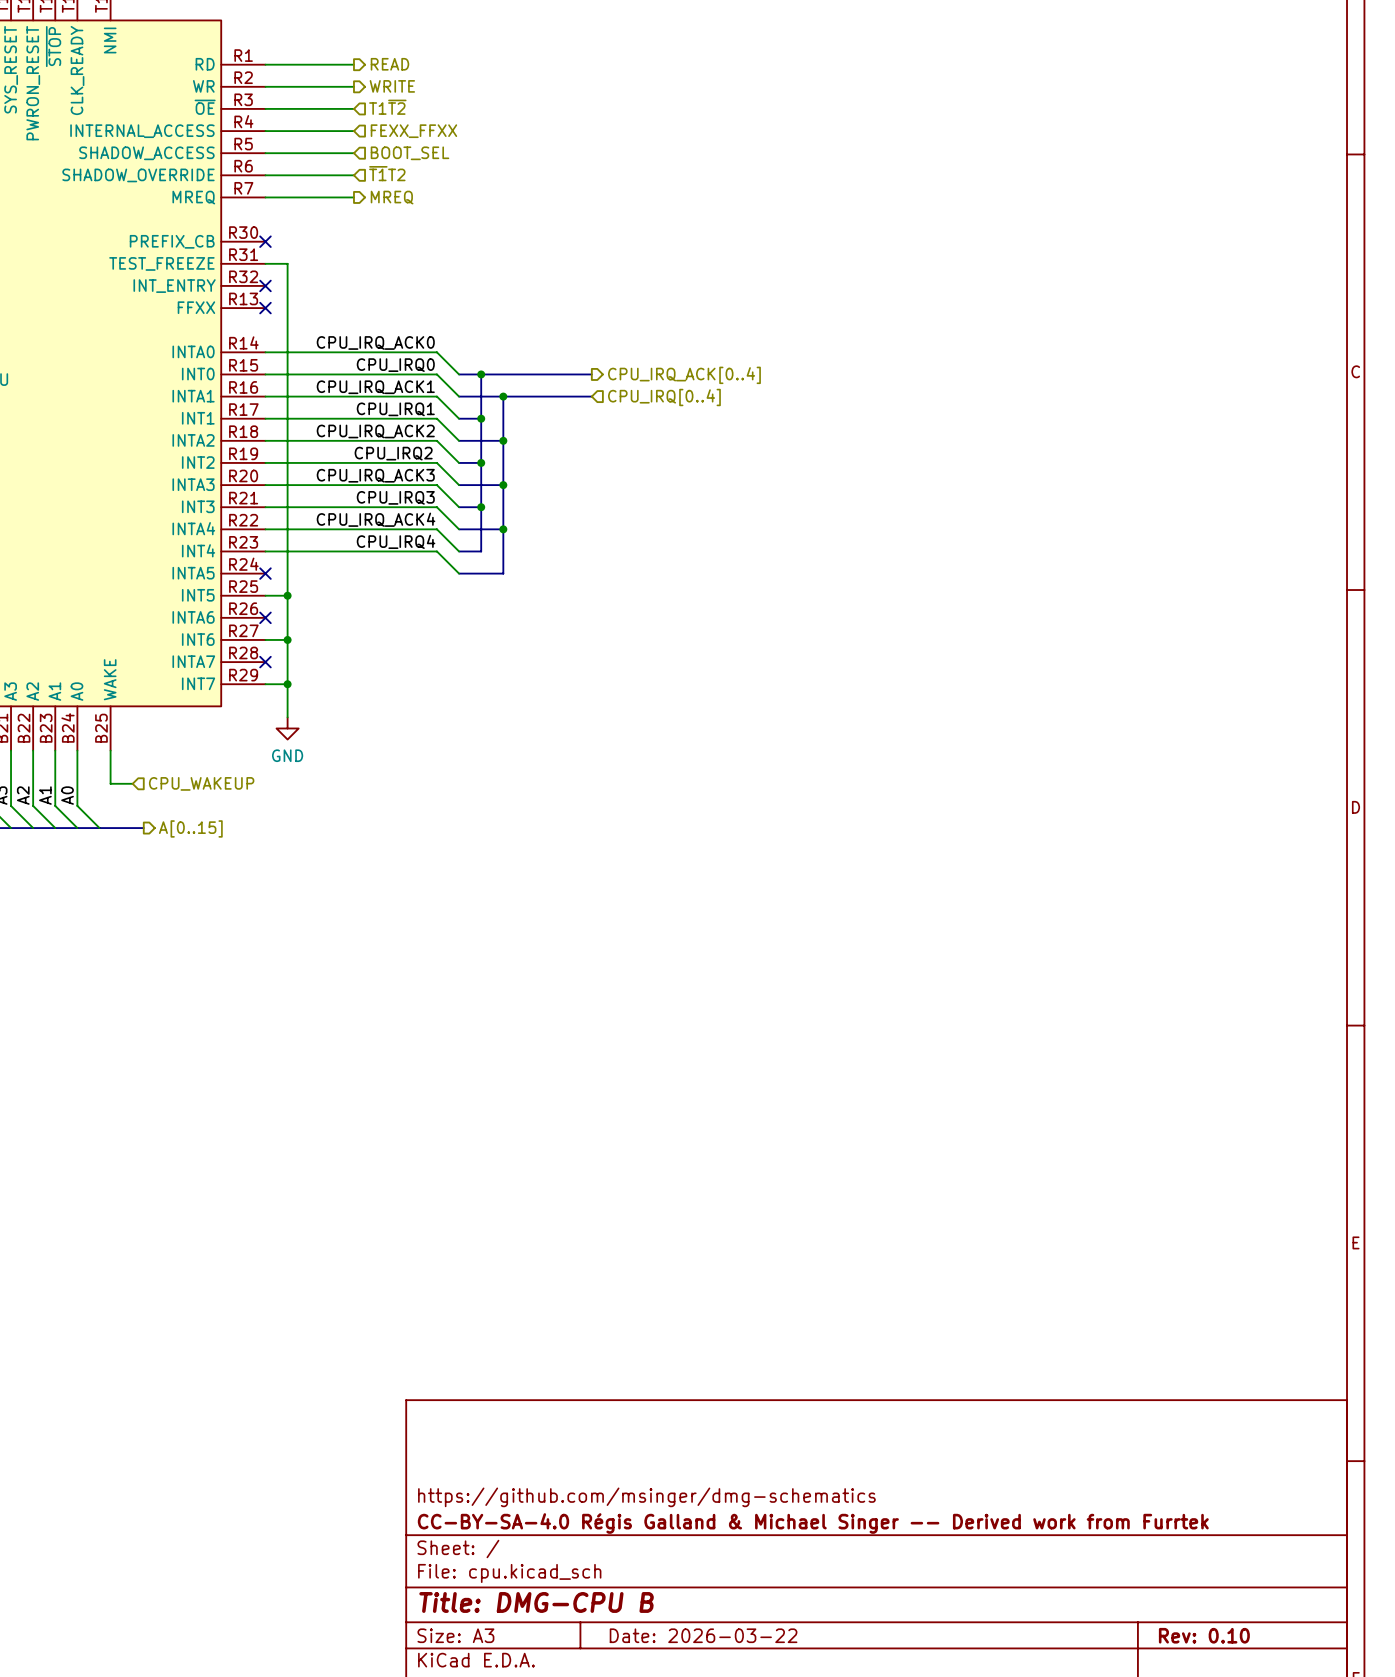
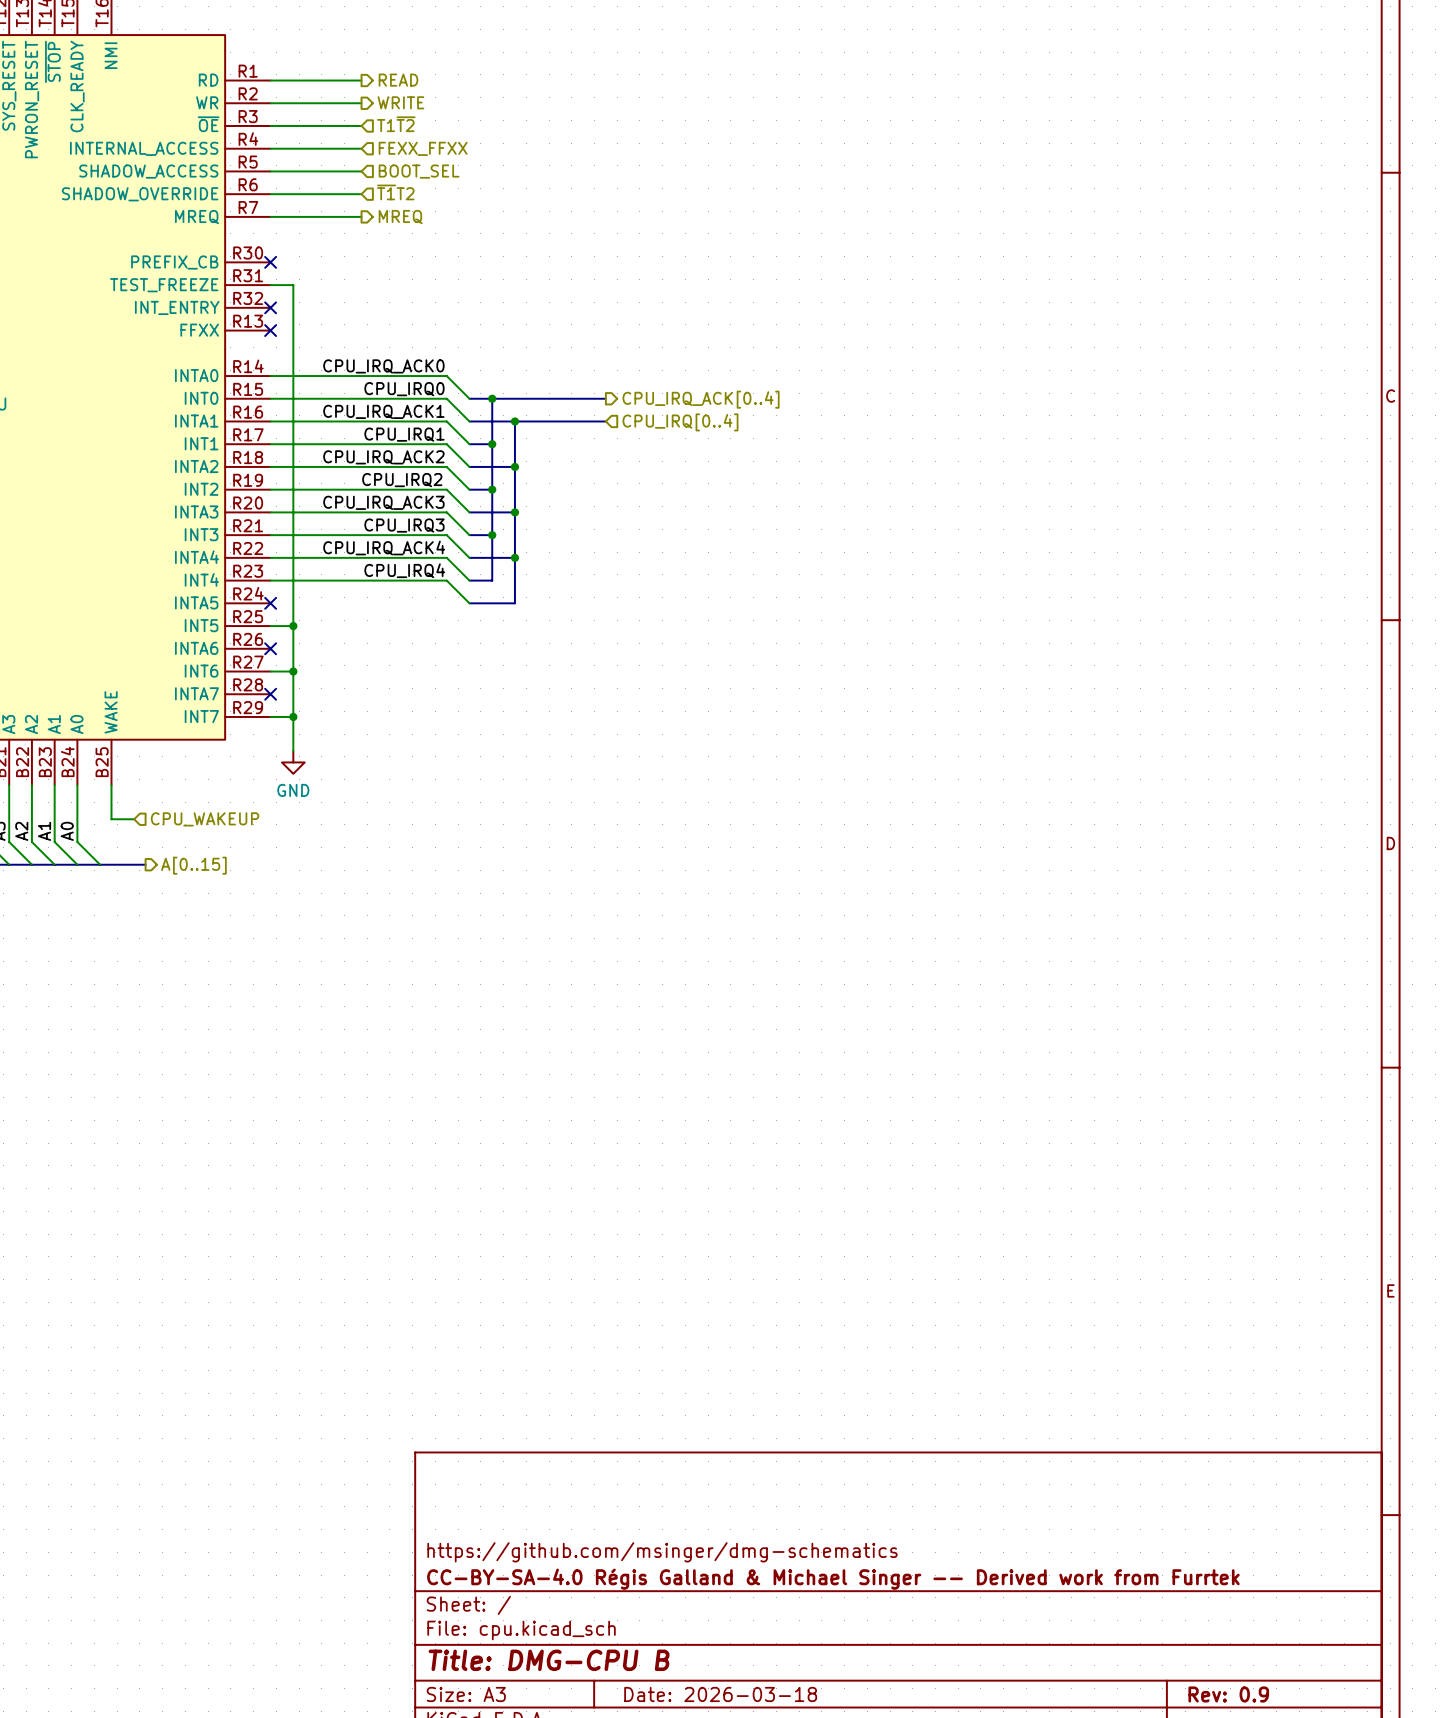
title block: Date: 2026-03-22 (703, 1635) -> Date: 2026-03-18 (720, 1694)
title block: Rev: 0.10 (1204, 1635) -> Rev: 0.9 (1228, 1694)

